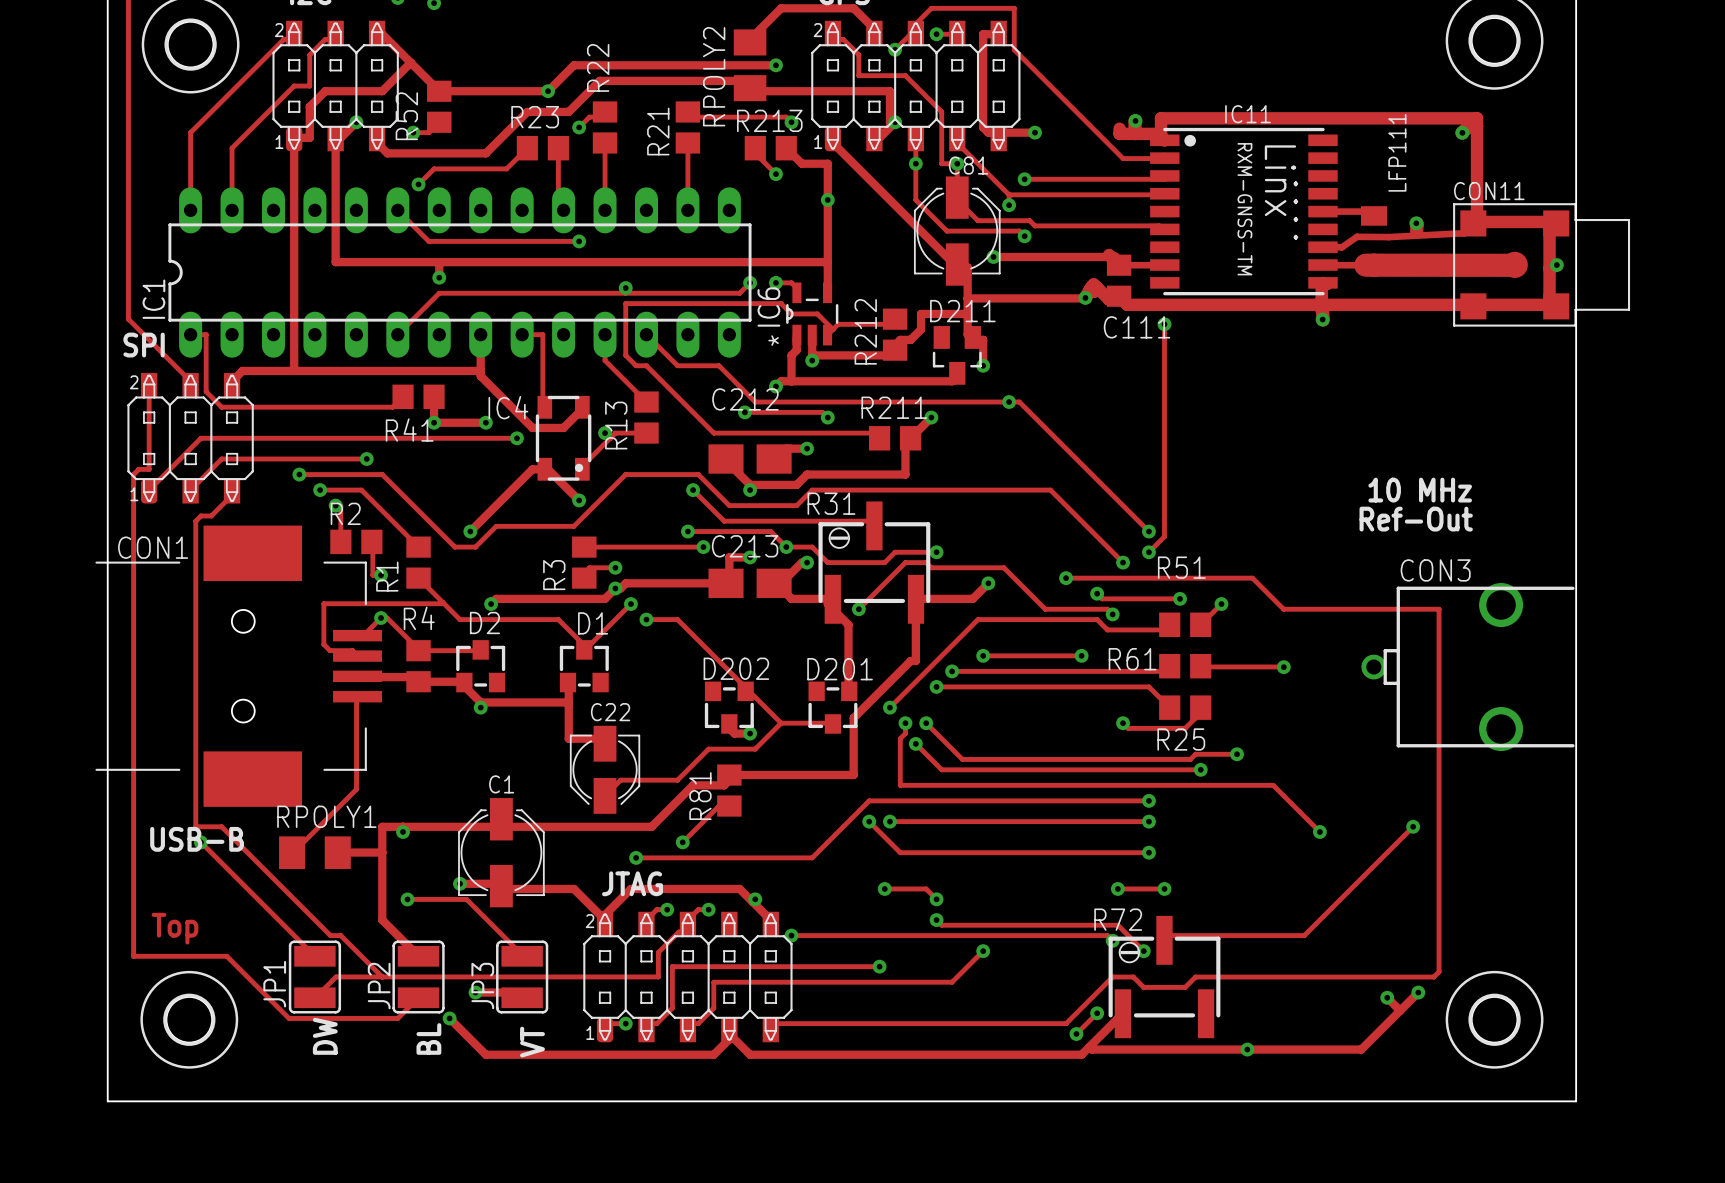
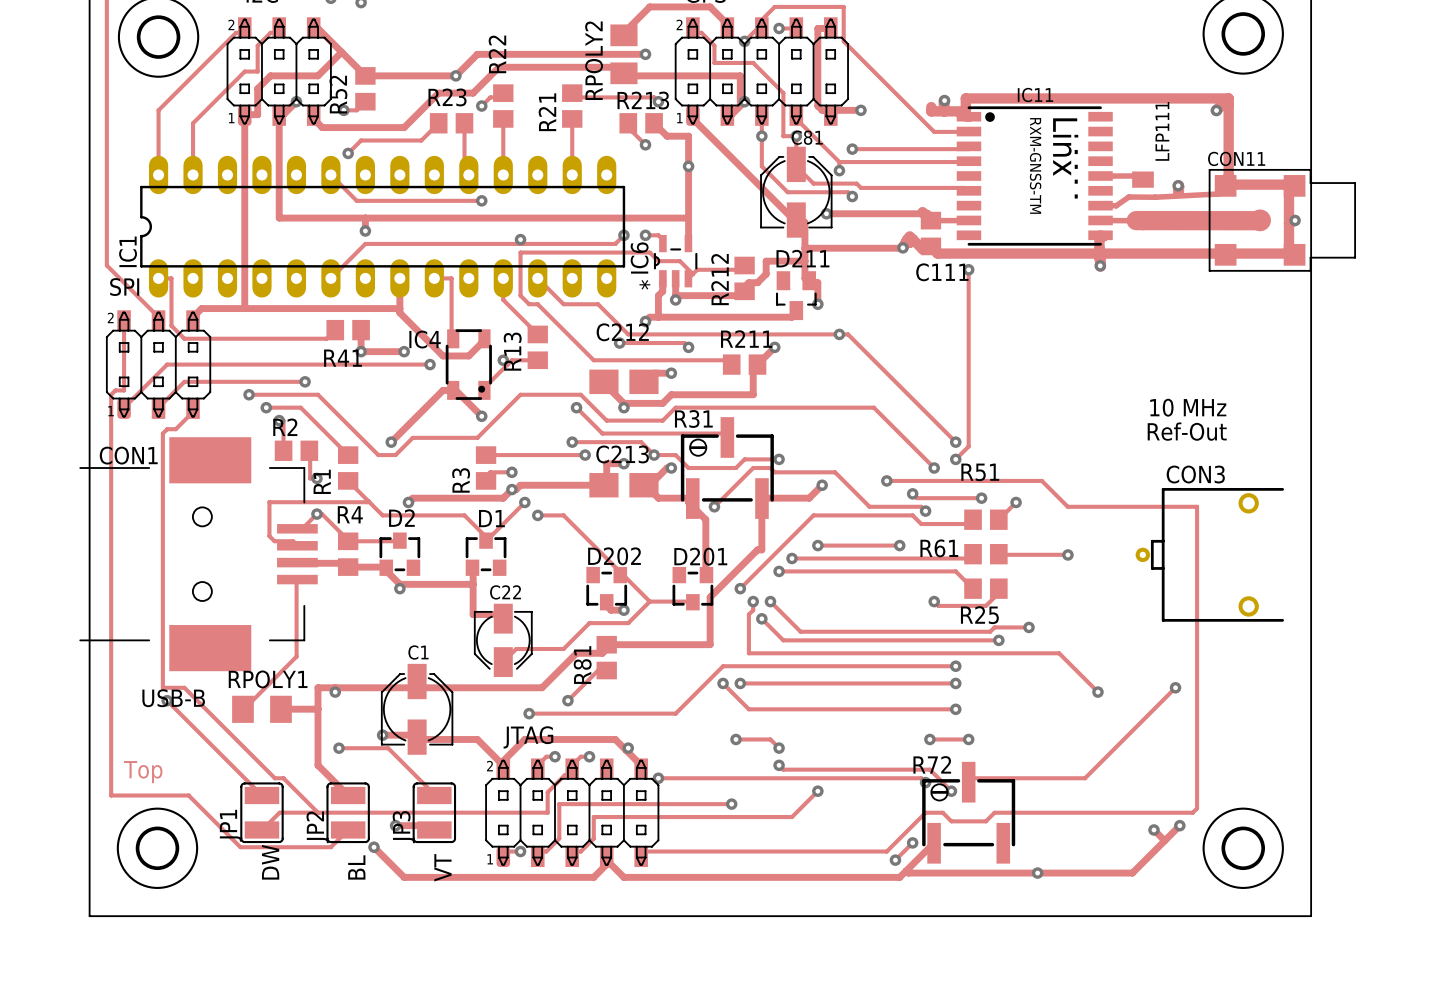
CON3 footprint: [1361, 583, 1575, 752] -> [1135, 488, 1284, 622]

